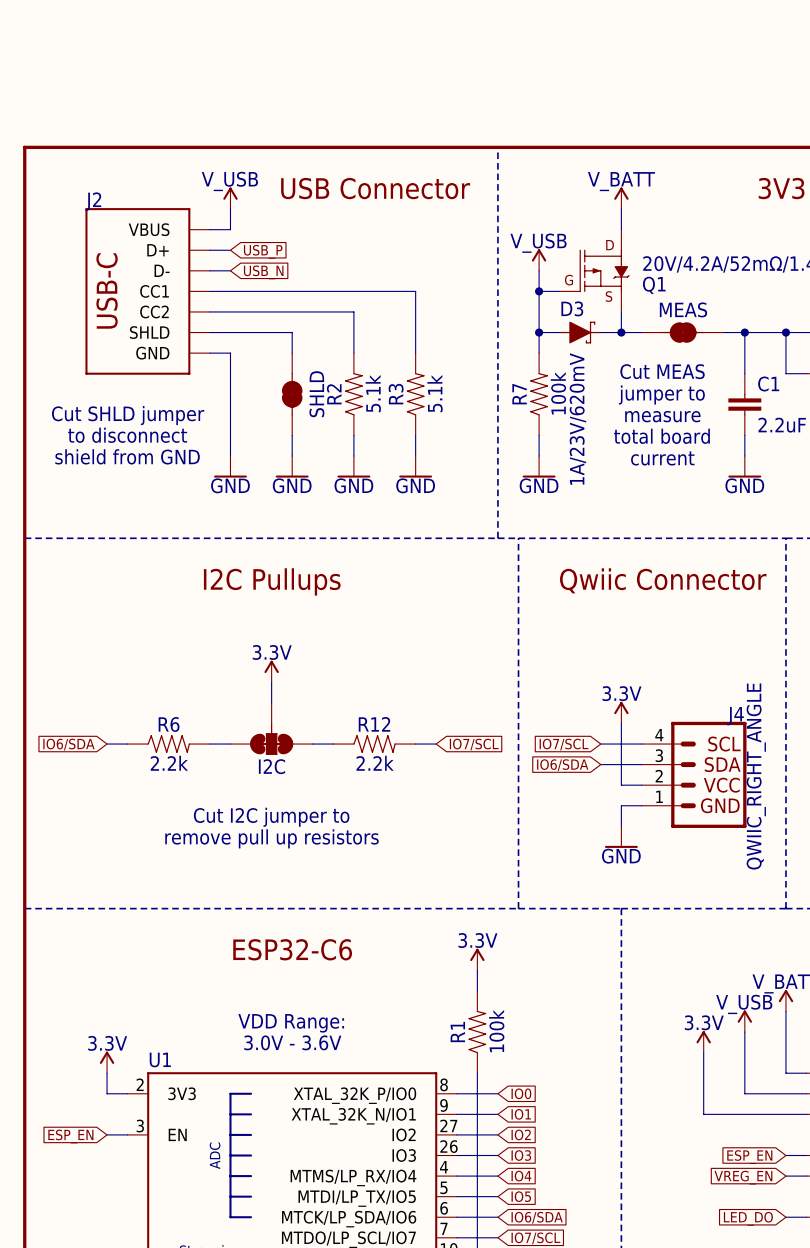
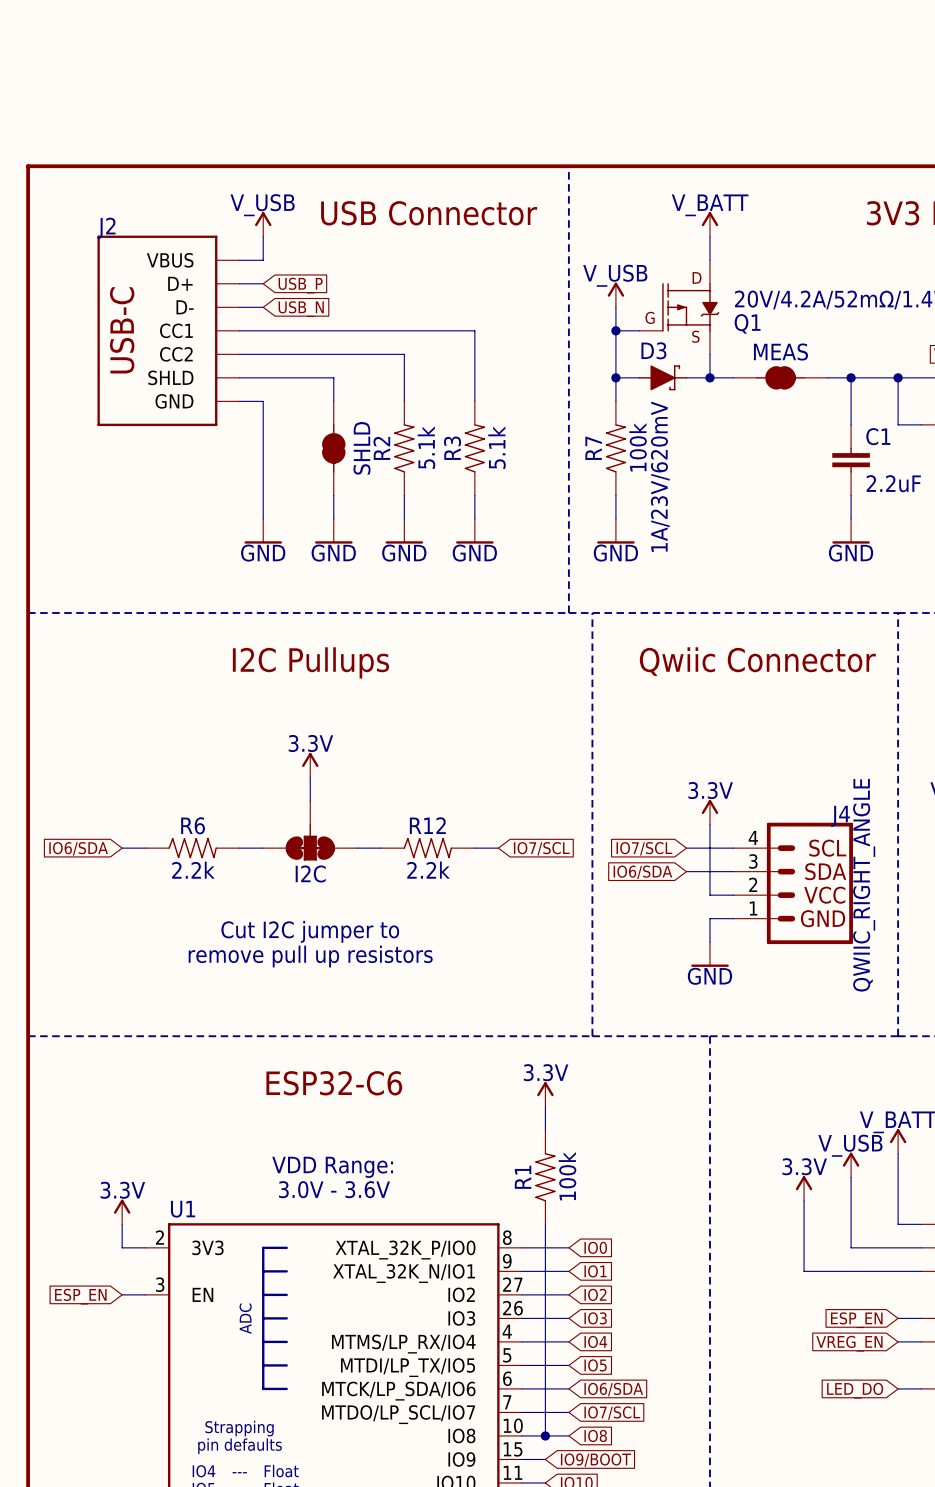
text: Cut MEAS (662, 371) -> none
text: jumper to (661, 394) -> none
text: Cut SHLD jumper (128, 415) -> none
text: measure (662, 416) -> none
text: to disconnect (127, 435) -> none
text: total board (661, 436) -> none
text: shield from GND (127, 456) -> none
text: current (662, 458) -> none

